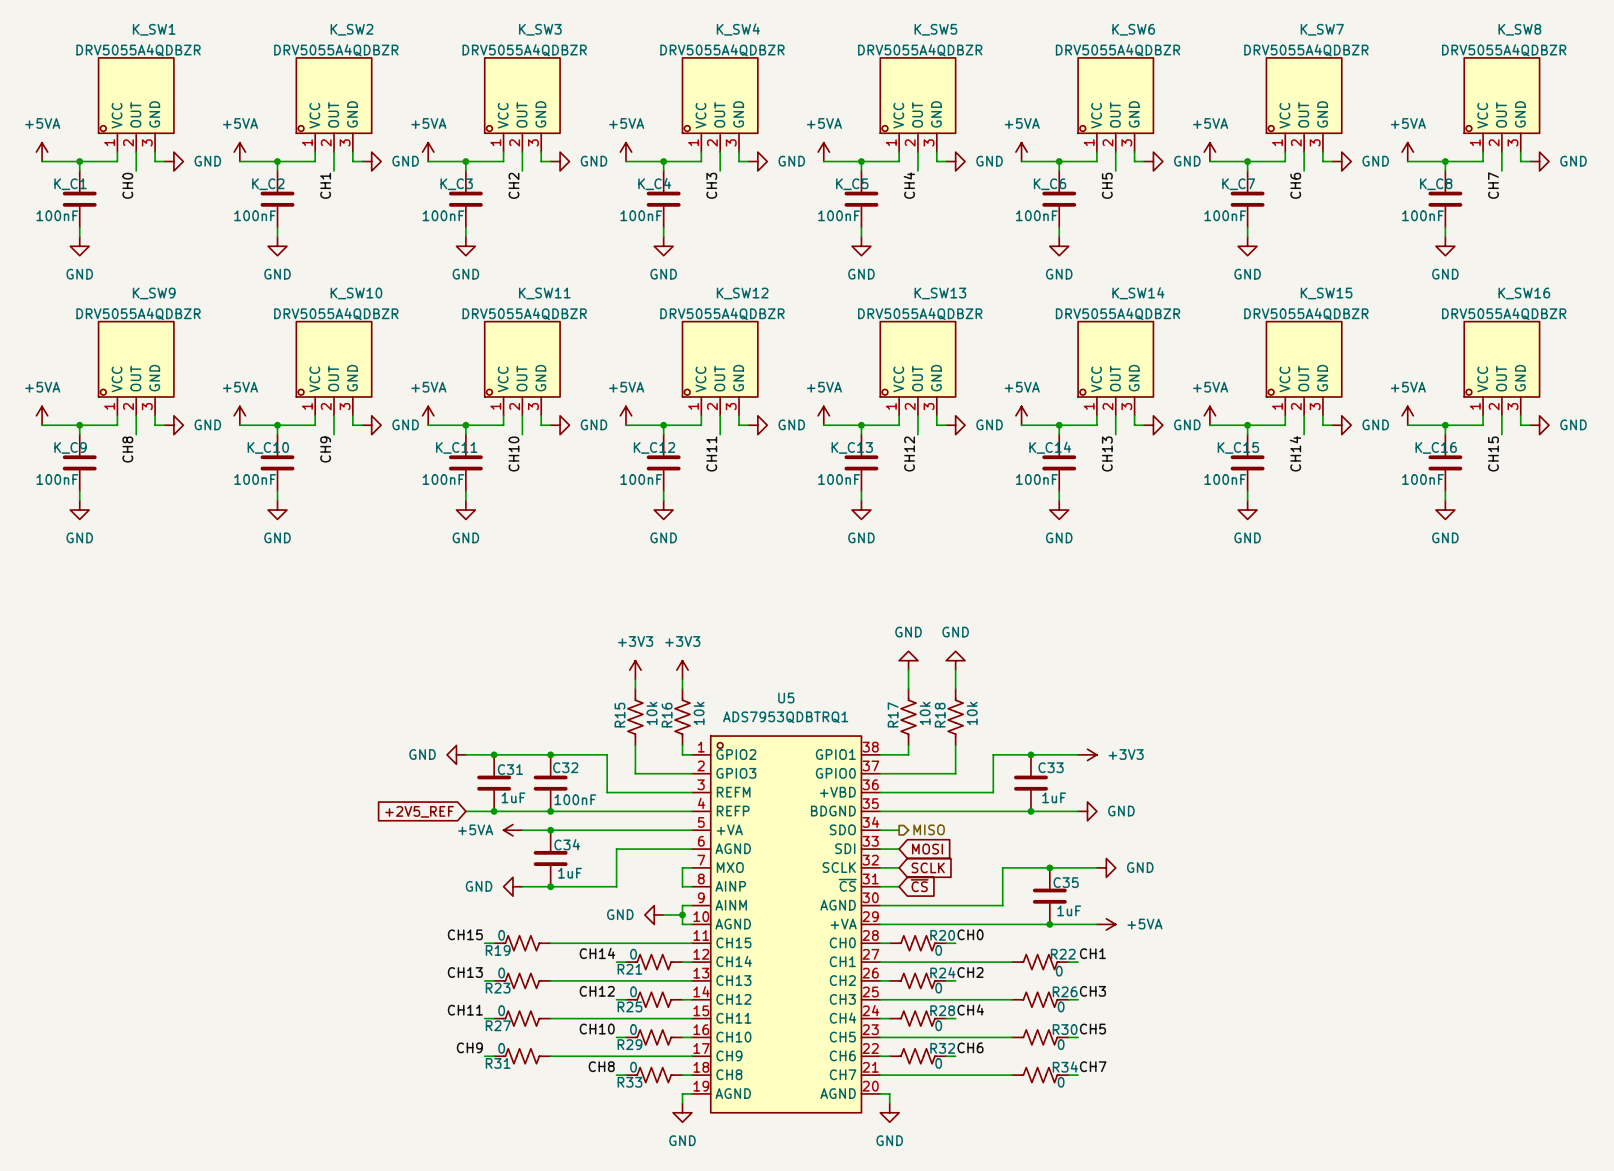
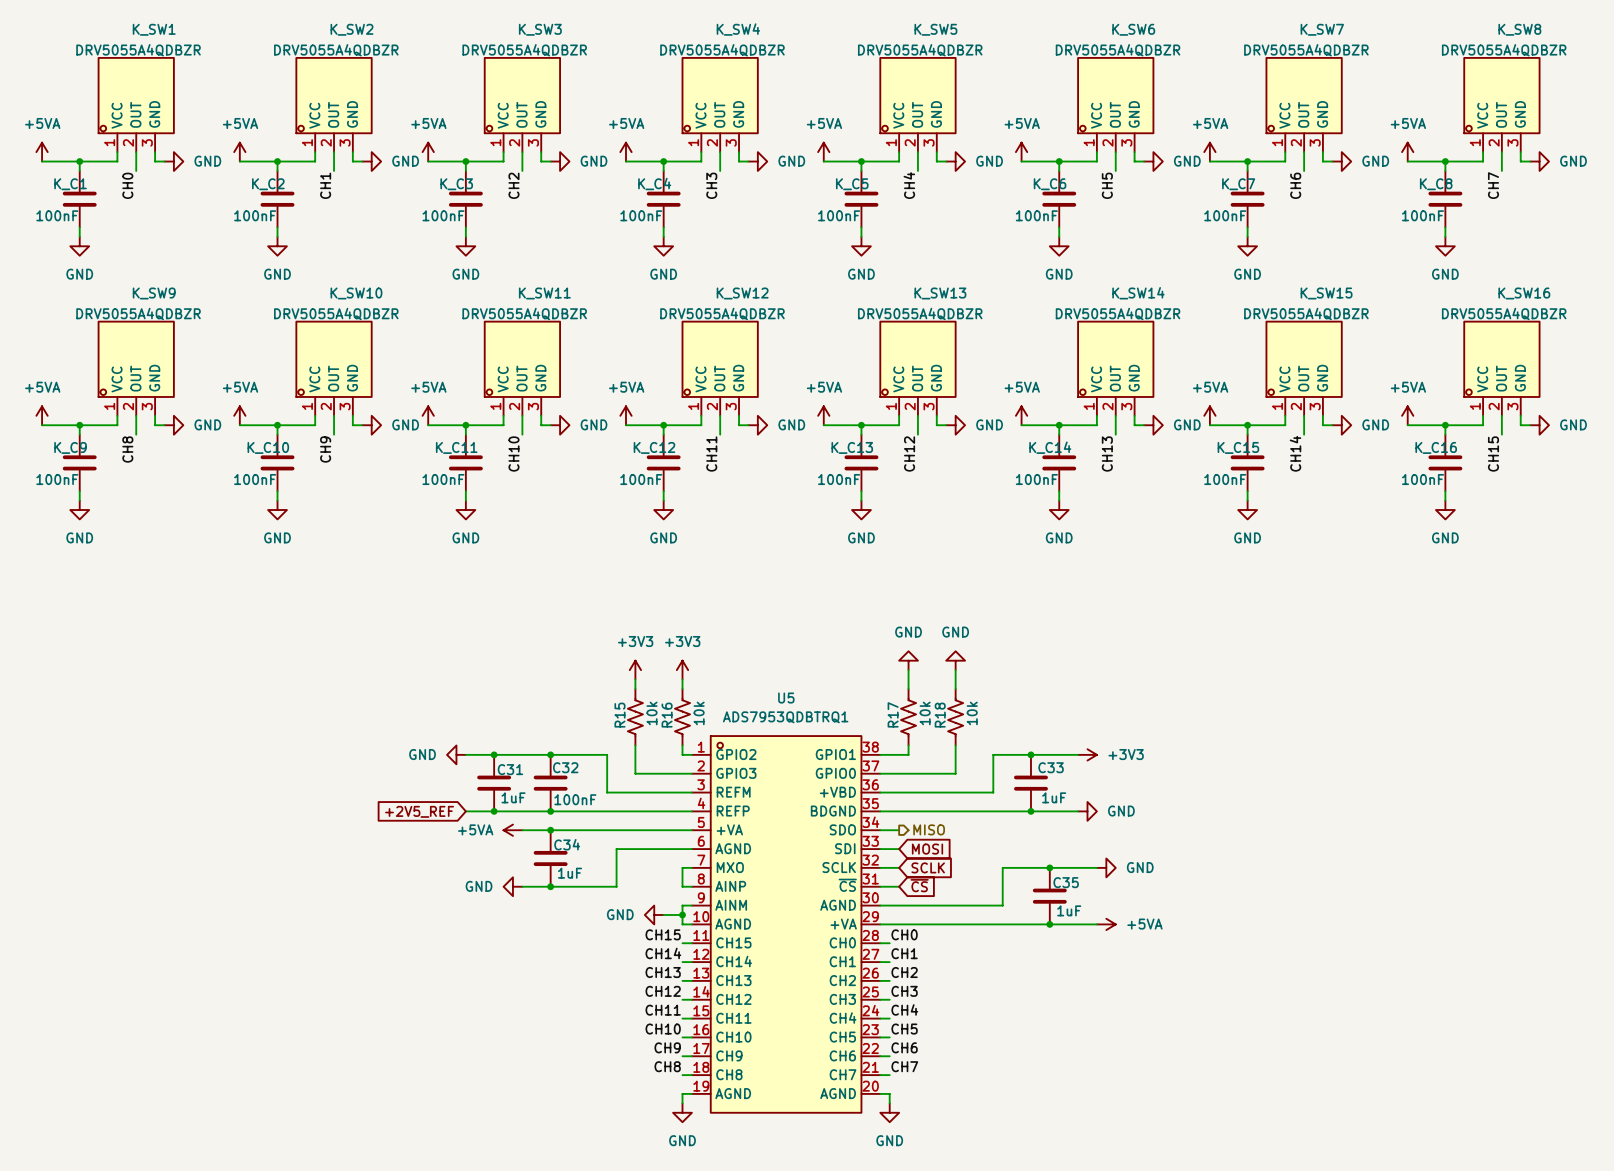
label: CH15 (465, 934) -> none
label: none -> CH15 (663, 934)
label position: CH0 (970, 934) -> CH0 (904, 934)
wire: (484, 943) (494, 943) -> none
R19: 0 (522, 943) -> none
wire: (550, 943) (682, 943) -> none
R20: 0 (917, 943) -> none
wire: (946, 943) (955, 943) -> none
label position: CH14 (597, 953) -> CH14 (663, 953)
label: none -> CH1 (904, 953)
label: CH1 (1092, 953) -> none
wire: (616, 962) (625, 962) -> none
R21: 0 (654, 962) -> none
wire: (889, 962) (1012, 962) -> none
R22: 0 (1040, 962) -> none
wire: (1068, 962) (1078, 962) -> none
label: CH13 (465, 972) -> none
label: none -> CH13 (663, 972)
label position: CH2 (970, 972) -> CH2 (904, 972)
wire: (484, 980) (494, 980) -> none
R23: 0 (522, 980) -> none
wire: (550, 980) (682, 980) -> none
R24: 0 (917, 980) -> none
wire: (946, 980) (955, 980) -> none
label position: CH12 (597, 991) -> CH12 (663, 991)
label: none -> CH3 (904, 991)
label: CH3 (1092, 991) -> none
wire: (616, 999) (625, 999) -> none
R25: 0 (654, 999) -> none
wire: (889, 999) (1012, 999) -> none
R26: 0 (1040, 999) -> none
wire: (1068, 999) (1078, 999) -> none
label position: CH4 (970, 1009) -> CH4 (904, 1009)
label: CH11 (465, 1010) -> none
label: none -> CH11 (663, 1010)
wire: (484, 1018) (494, 1018) -> none
R27: 0 (522, 1018) -> none
wire: (550, 1018) (682, 1018) -> none
R28: 0 (917, 1018) -> none
wire: (946, 1018) (955, 1018) -> none
label position: CH10 (597, 1029) -> CH10 (663, 1029)
label: none -> CH5 (904, 1029)
label: CH5 (1092, 1029) -> none
wire: (616, 1037) (625, 1037) -> none
R29: 0 (654, 1037) -> none
wire: (889, 1037) (1012, 1037) -> none
R30: 0 (1040, 1037) -> none
wire: (1068, 1037) (1078, 1037) -> none
label: CH9 (469, 1047) -> none
label: none -> CH9 (667, 1047)
label position: CH6 (970, 1047) -> CH6 (904, 1047)
wire: (484, 1056) (494, 1056) -> none
R31: 0 (522, 1056) -> none
wire: (550, 1056) (682, 1056) -> none
R32: 0 (917, 1056) -> none
wire: (946, 1056) (955, 1056) -> none
label position: CH8 (601, 1066) -> CH8 (667, 1066)
label: none -> CH7 (904, 1066)
label: CH7 (1093, 1066) -> none
wire: (616, 1075) (625, 1075) -> none
R33: 0 (654, 1075) -> none
wire: (889, 1075) (1012, 1075) -> none
R34: 0 (1040, 1075) -> none
wire: (1068, 1075) (1078, 1075) -> none

